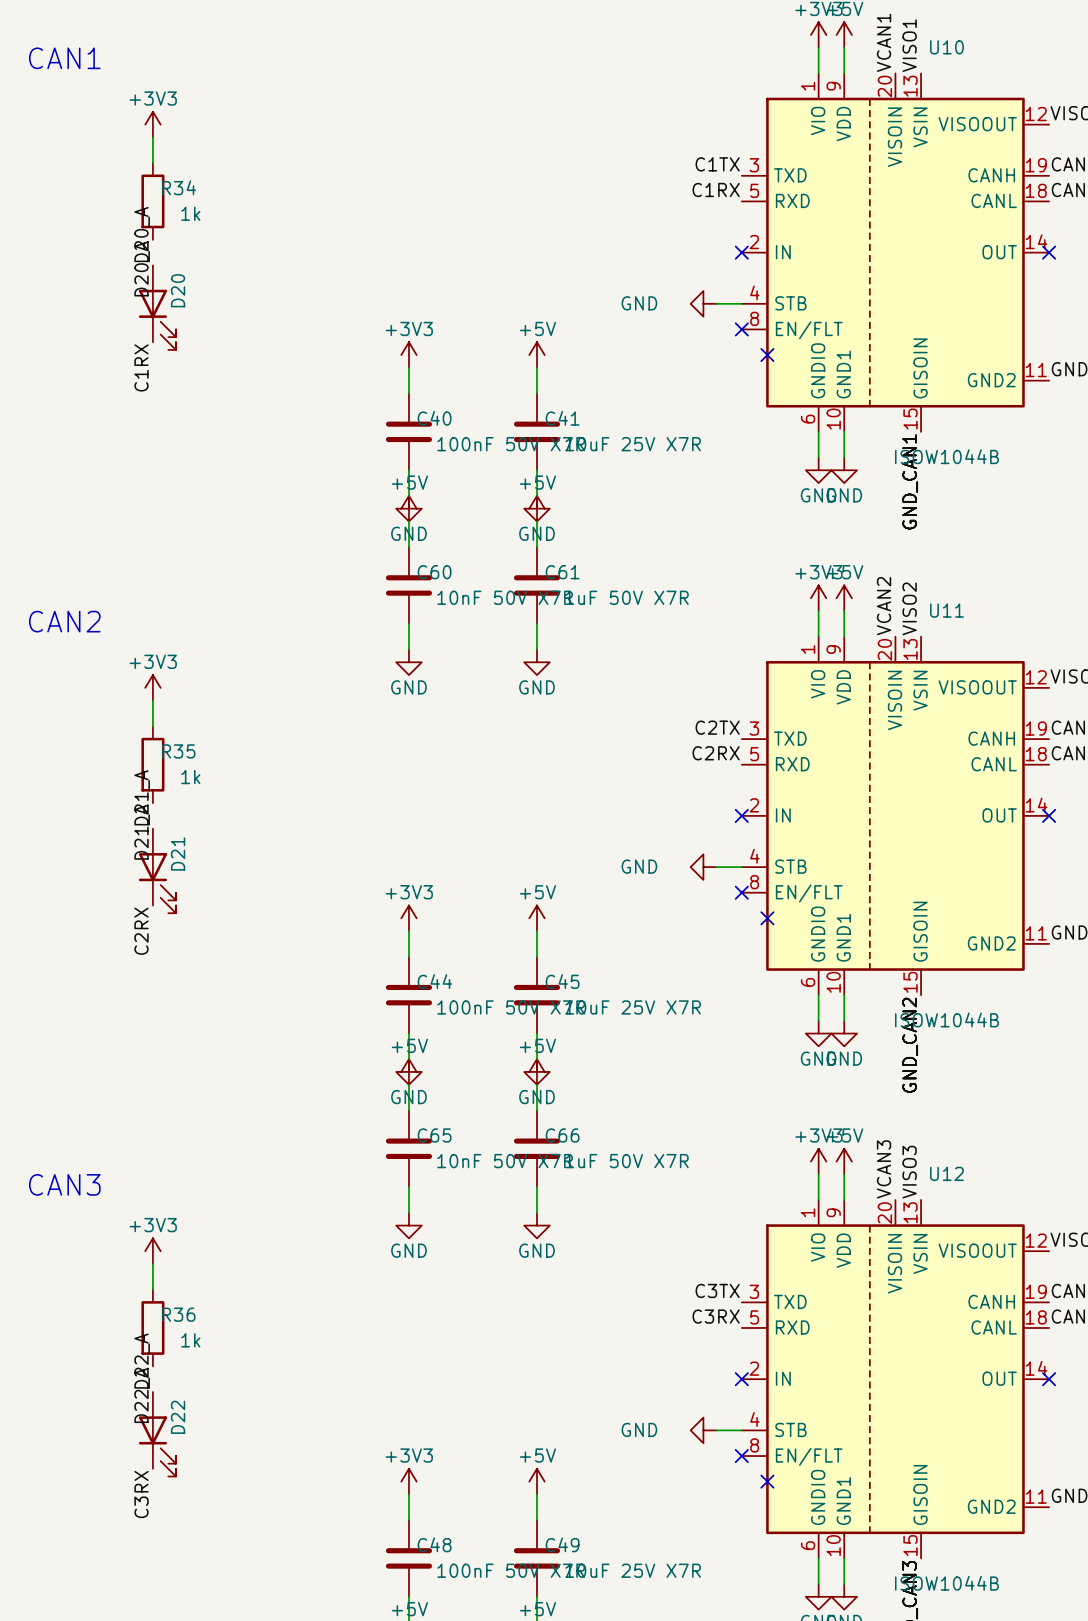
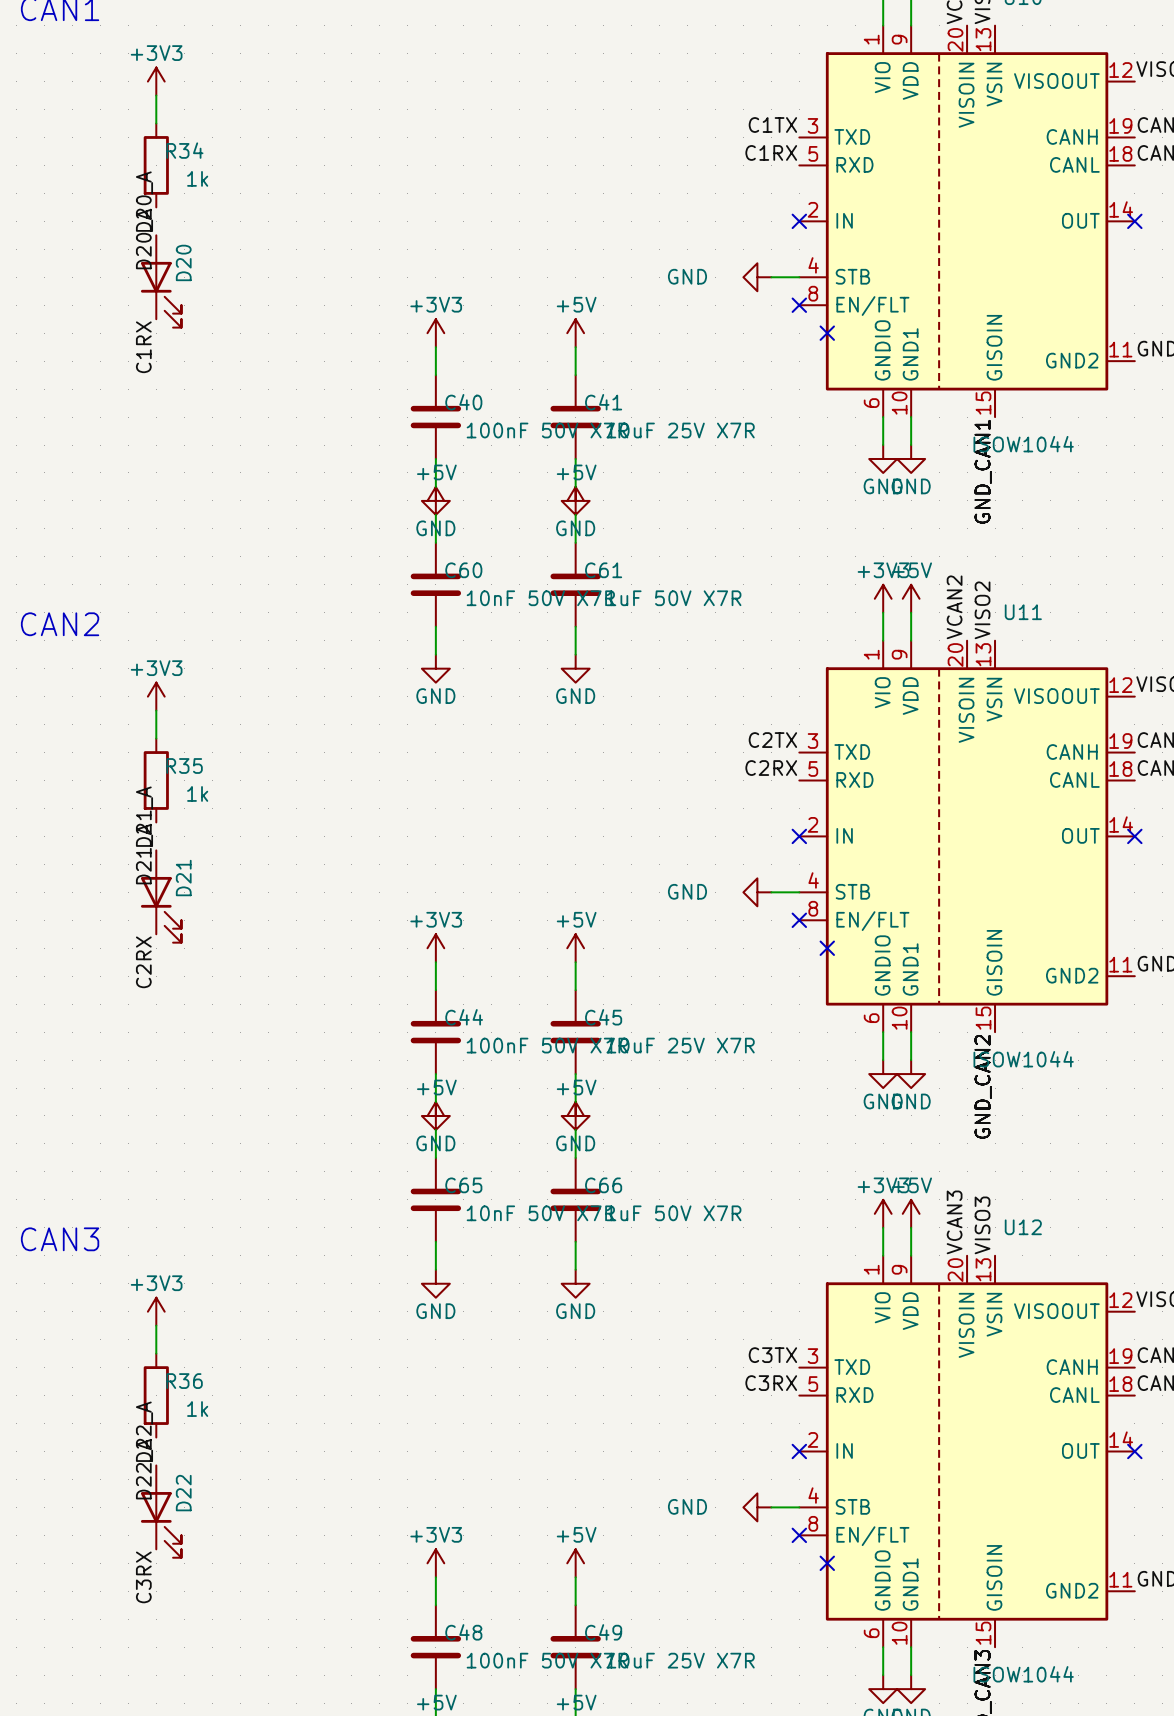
U10 value: ISOW1044B (946, 456) -> ISOW1044 (1023, 444)
U11 value: ISOW1044B (946, 1019) -> ISOW1044 (1023, 1059)
U12 value: ISOW1044B (946, 1583) -> ISOW1044 (1023, 1674)

